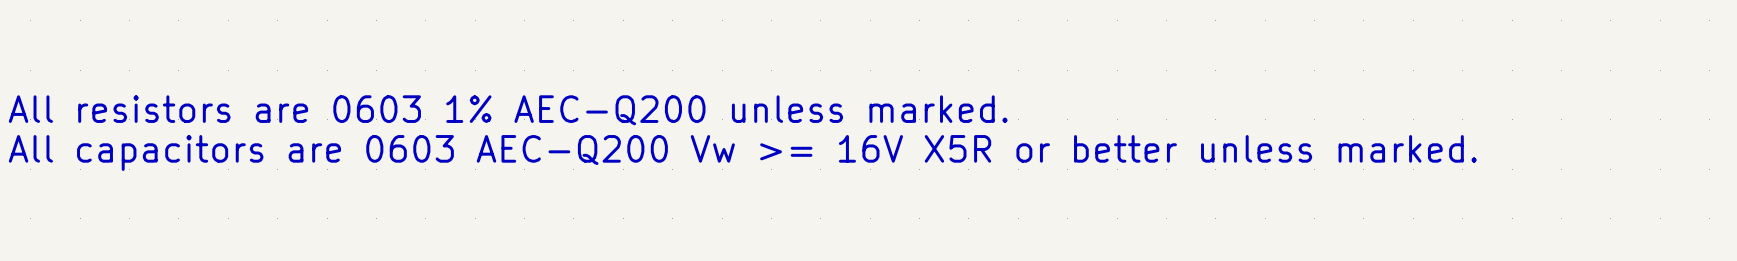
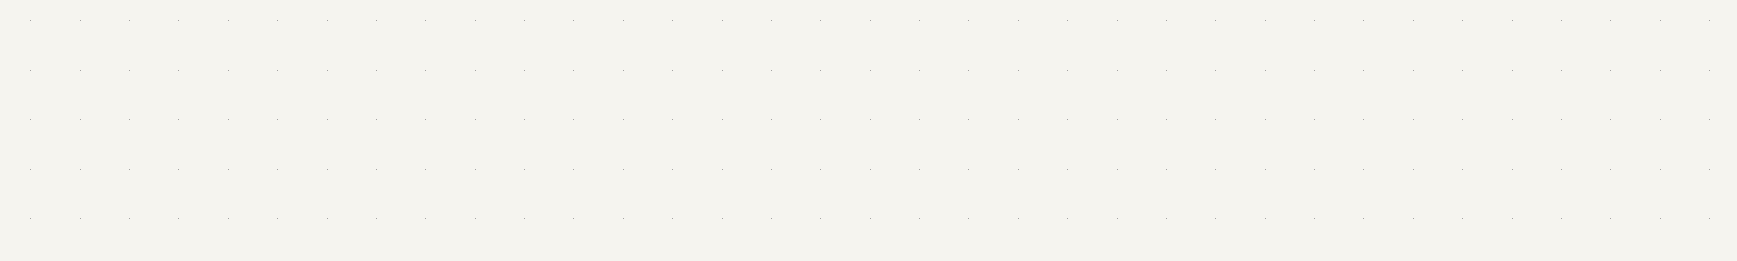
text: All resistors are 0603 1% AEC-Q200 unless marked. (508, 110) -> none
text: All capacitors are 0603 AEC-Q200 Vw >= 16V X5R or better unless marked. (742, 152) -> none

